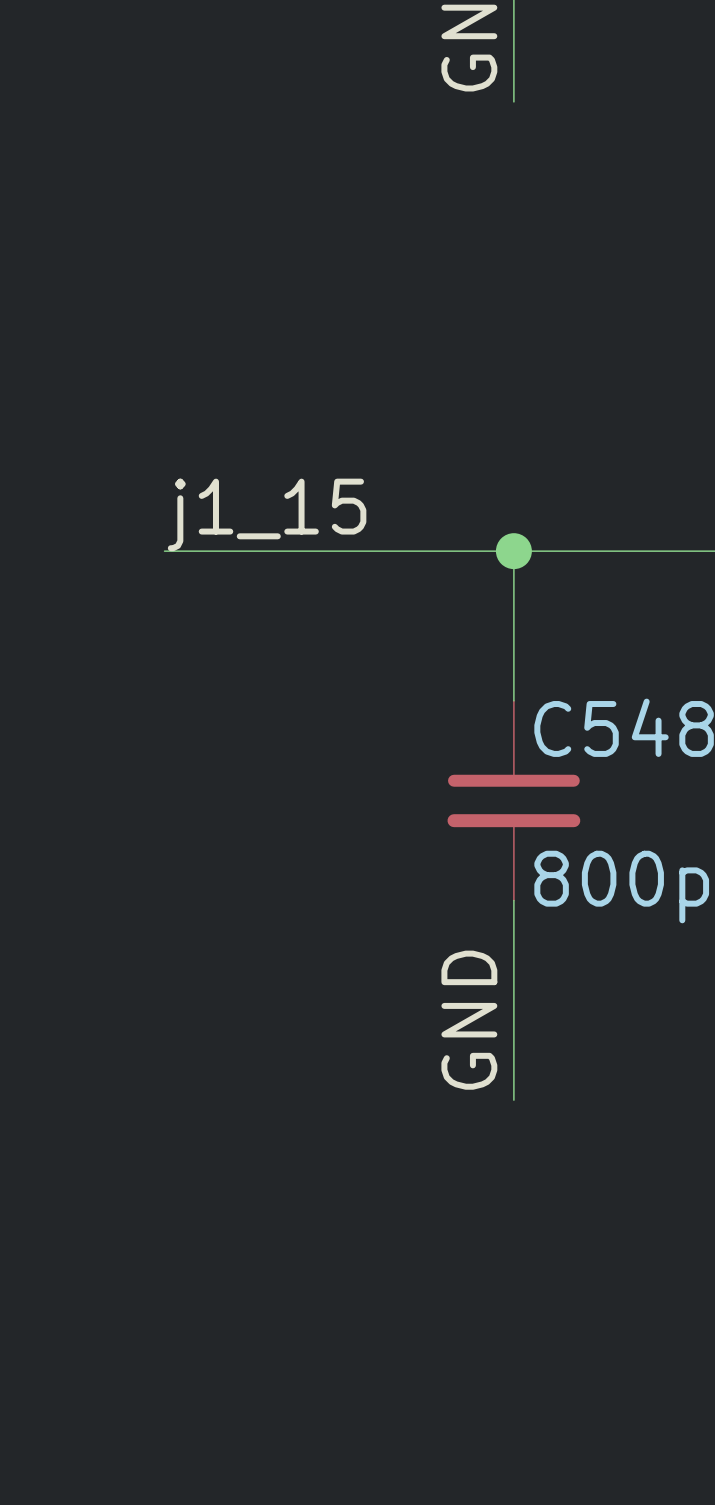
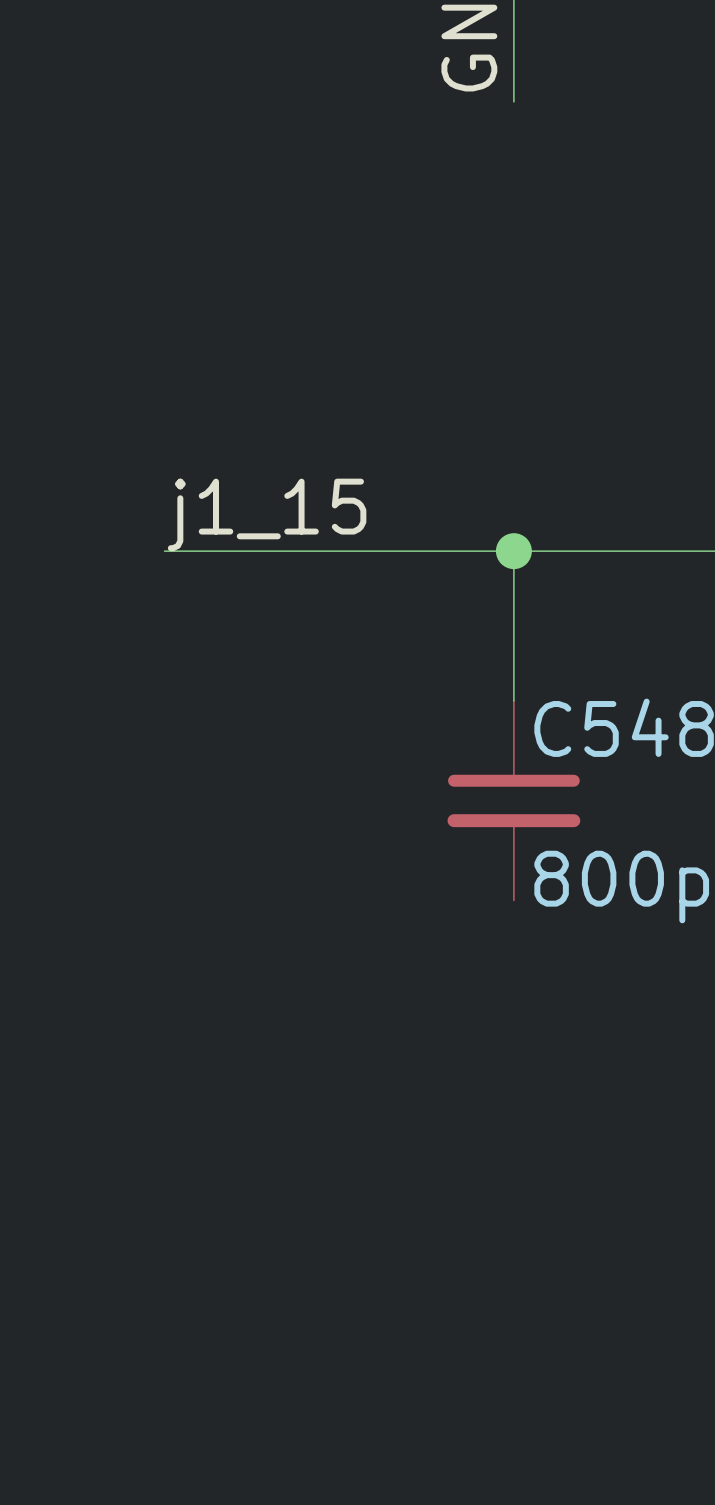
wire: (513, 900) (513, 1100) -> none
label: GND (469, 1020) -> none

